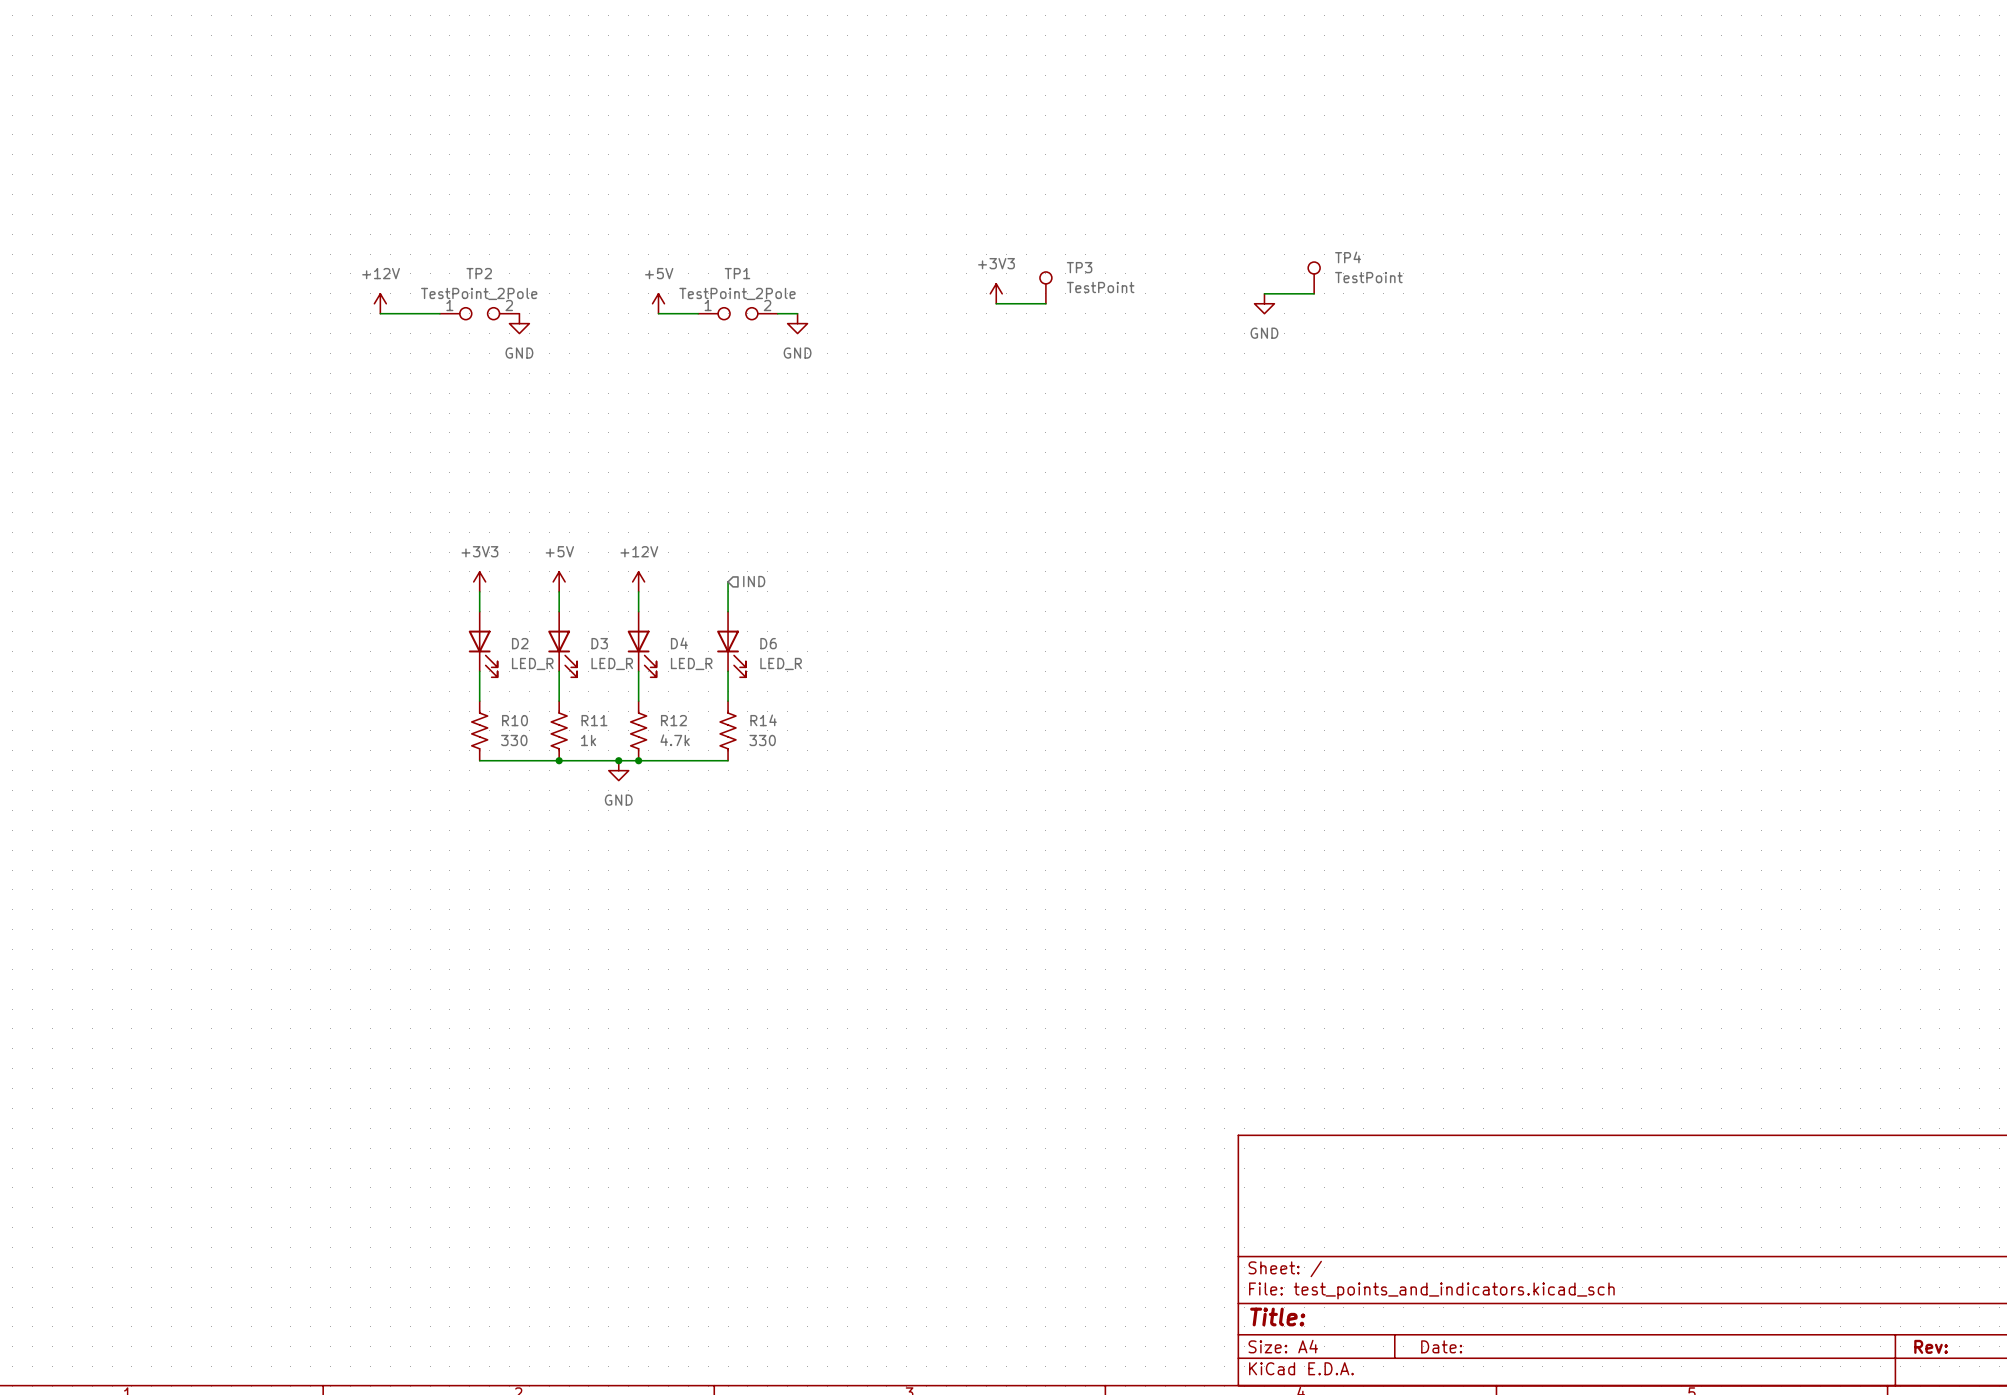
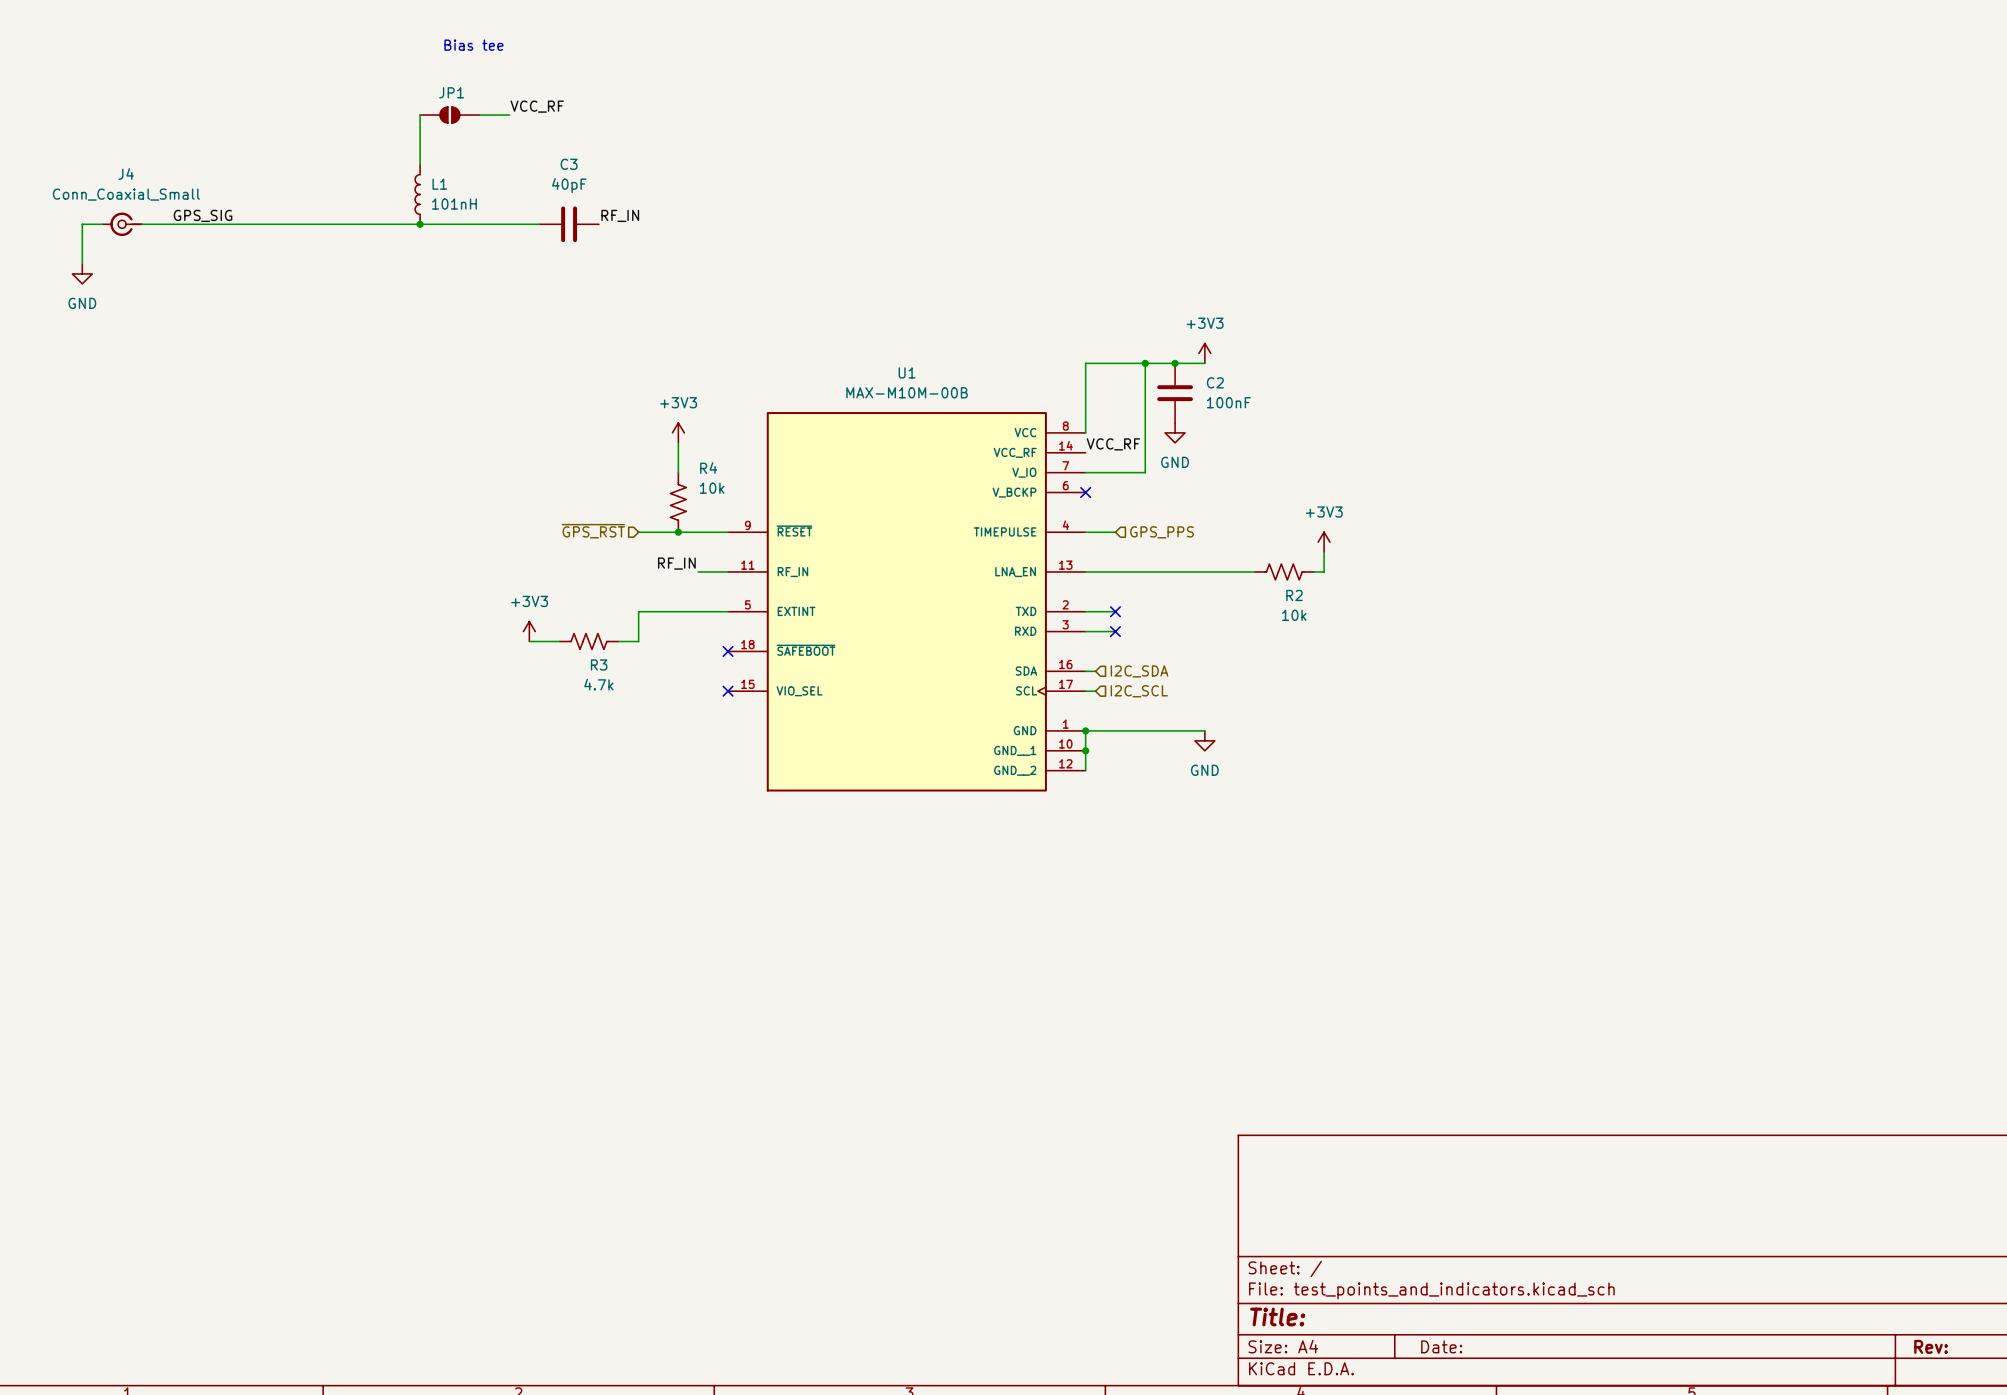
text: none -> Bias tee (473, 45)
label: none -> VCC_RF (537, 106)
wire: none -> (420, 115) (420, 164)
JP1: none -> (449, 115)
wire: none -> (479, 115) (509, 115)
L1: none -> 101nH (417, 194)
label: none -> GPS_SIG (203, 215)
label: none -> RF_IN (620, 215)
wire: none -> (102, 224) (82, 224) (82, 264)
J4: none -> Conn_Coaxial_Small (122, 224)
wire: none -> (141, 224) (539, 224)
junction: none -> (420, 224)
C3: none -> 40pF (569, 224)
power symbol: none -> GND (82, 273)
TP4: TestPoint (1314, 277) -> none
TP3: TestPoint (1045, 287) -> none
power symbol: +3V3 (996, 293) -> none
wire: (1264, 293) (1314, 293) -> none
power symbol: +12V (380, 303) -> none
power symbol: +5V (658, 303) -> none
wire: (996, 303) (1045, 303) -> none
power symbol position: GND (1264, 303) -> GND (1175, 432)
wire: (380, 313) (439, 313) -> none
TP2: TestPoint_2Pole (479, 313) -> none
wire: (658, 313) (698, 313) -> none
TP1: TestPoint_2Pole (737, 313) -> none
wire: (777, 313) (797, 313) -> none
power symbol: GND (519, 323) -> none
power symbol: GND (797, 323) -> none
power symbol: none -> +3V3 (1204, 353)
wire: none -> (1145, 363) (1145, 472) (1085, 472)
junction: none -> (1145, 363)
junction: none -> (1175, 363)
wire: none -> (1204, 363) (1085, 363) (1085, 432)
C2: none -> 100nF (1175, 393)
power symbol: none -> +3V3 (678, 432)
wire: none -> (678, 442) (678, 472)
label: none -> VCC_RF (1113, 444)
no-connect mark: none -> (1085, 492)
R4: none -> 10k (678, 502)
hierarchical label: none -> ~{GPS_RST} (593, 531)
wire: none -> (638, 532) (728, 532)
junction: none -> (678, 532)
wire: none -> (1085, 532) (1115, 532)
hierarchical label: none -> GPS_PPS (1161, 532)
power symbol: none -> +3V3 (1324, 542)
wire: none -> (1324, 552) (1324, 571) (1314, 571)
label: none -> RF_IN (676, 563)
wire: none -> (698, 571) (728, 571)
wire: none -> (1085, 571) (1254, 571)
R2: none -> 10k (1284, 571)
power symbol position: +3V3 (479, 581) -> +3V3 (529, 631)
power symbol: +5V (559, 581) -> none
power symbol: +12V (638, 581) -> none
wire: (728, 581) (728, 611) -> (618, 641) (638, 641) (638, 611) (728, 611)
hierarchical label: IND (754, 581) -> none
wire: (479, 591) (479, 611) -> none
wire: (559, 591) (559, 611) -> none
wire: (638, 591) (638, 611) -> none
U1: none -> MAX-M10M-00B (906, 601)
wire: none -> (1085, 611) (1115, 611)
no-connect mark: none -> (1115, 611)
wire: none -> (1085, 631) (1115, 631)
no-connect mark: none -> (1115, 631)
wire: none -> (529, 641) (559, 641)
R3: none -> 4.7k (588, 641)
D2: LED_R (483, 644) -> none
D3: LED_R (562, 644) -> none
D4: LED_R (642, 644) -> none
D6: LED_R (731, 644) -> none
no-connect mark: none -> (728, 651)
wire: (479, 671) (479, 701) -> none
wire: (559, 671) (559, 701) -> none
wire: (638, 671) (638, 701) -> none
wire: (728, 671) (728, 701) -> none
wire: none -> (1085, 671) (1095, 671)
hierarchical label: none -> I2C_SDA (1139, 671)
no-connect mark: none -> (728, 691)
wire: none -> (1085, 691) (1095, 691)
hierarchical label: none -> I2C_SCL (1139, 691)
R10: 330 (479, 730) -> none
R11: 1k (559, 730) -> none
R12: 4.7k (638, 730) -> none
R14: 330 (728, 730) -> none
junction: none -> (1085, 730)
wire: none -> (1204, 730) (1085, 730) (1085, 770)
power symbol: none -> GND (1204, 740)
junction: none -> (1085, 750)
wire: (479, 760) (728, 760) -> none
junction: (559, 760) -> none
junction: (618, 760) -> none
junction: (638, 760) -> none
power symbol: GND (618, 770) -> none

